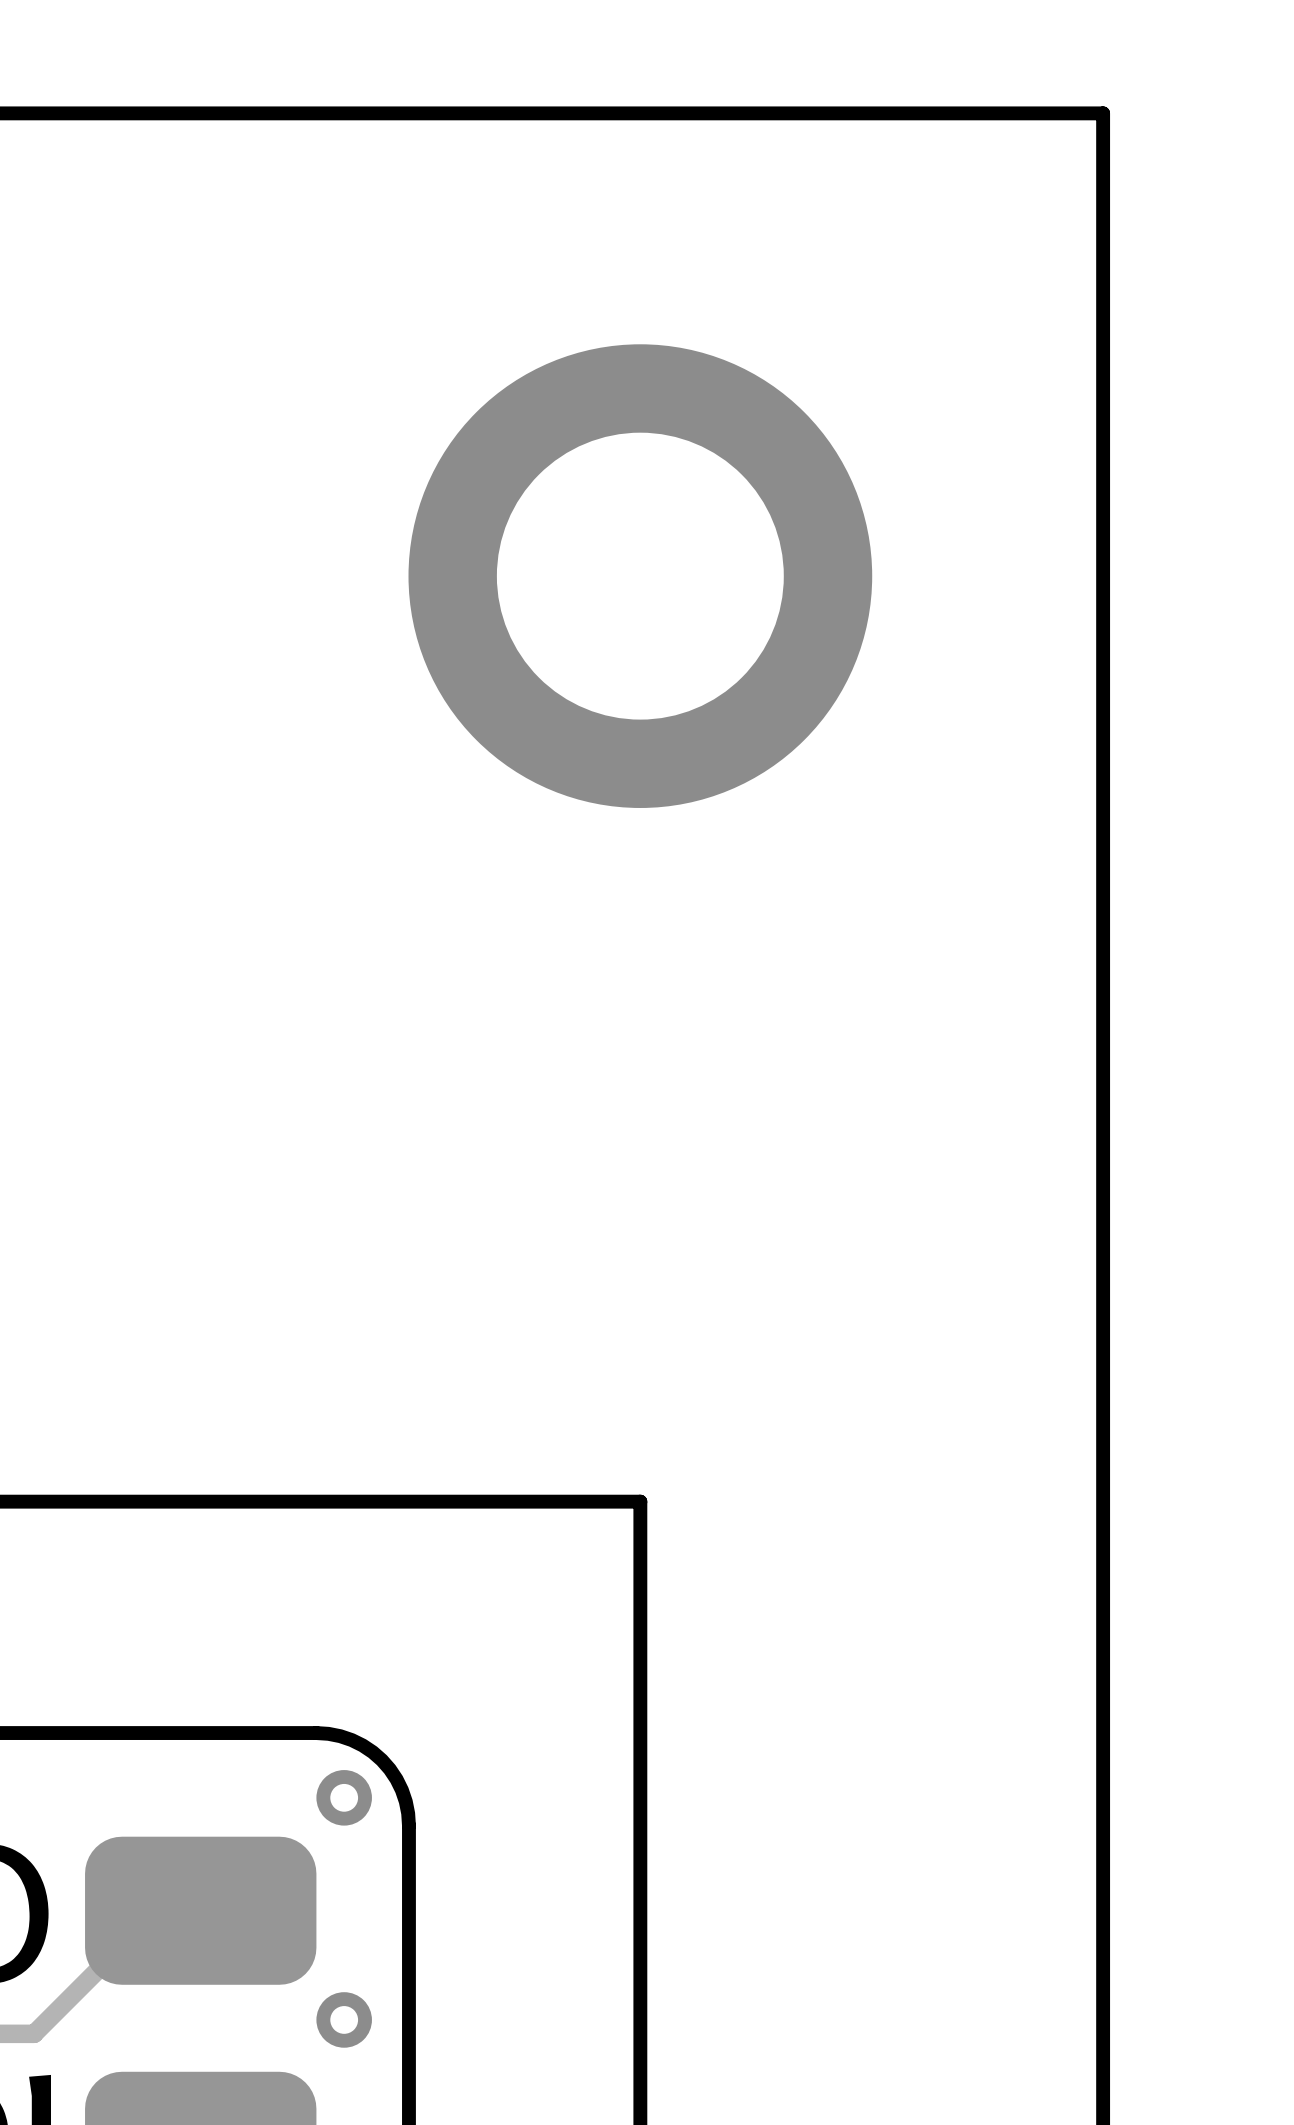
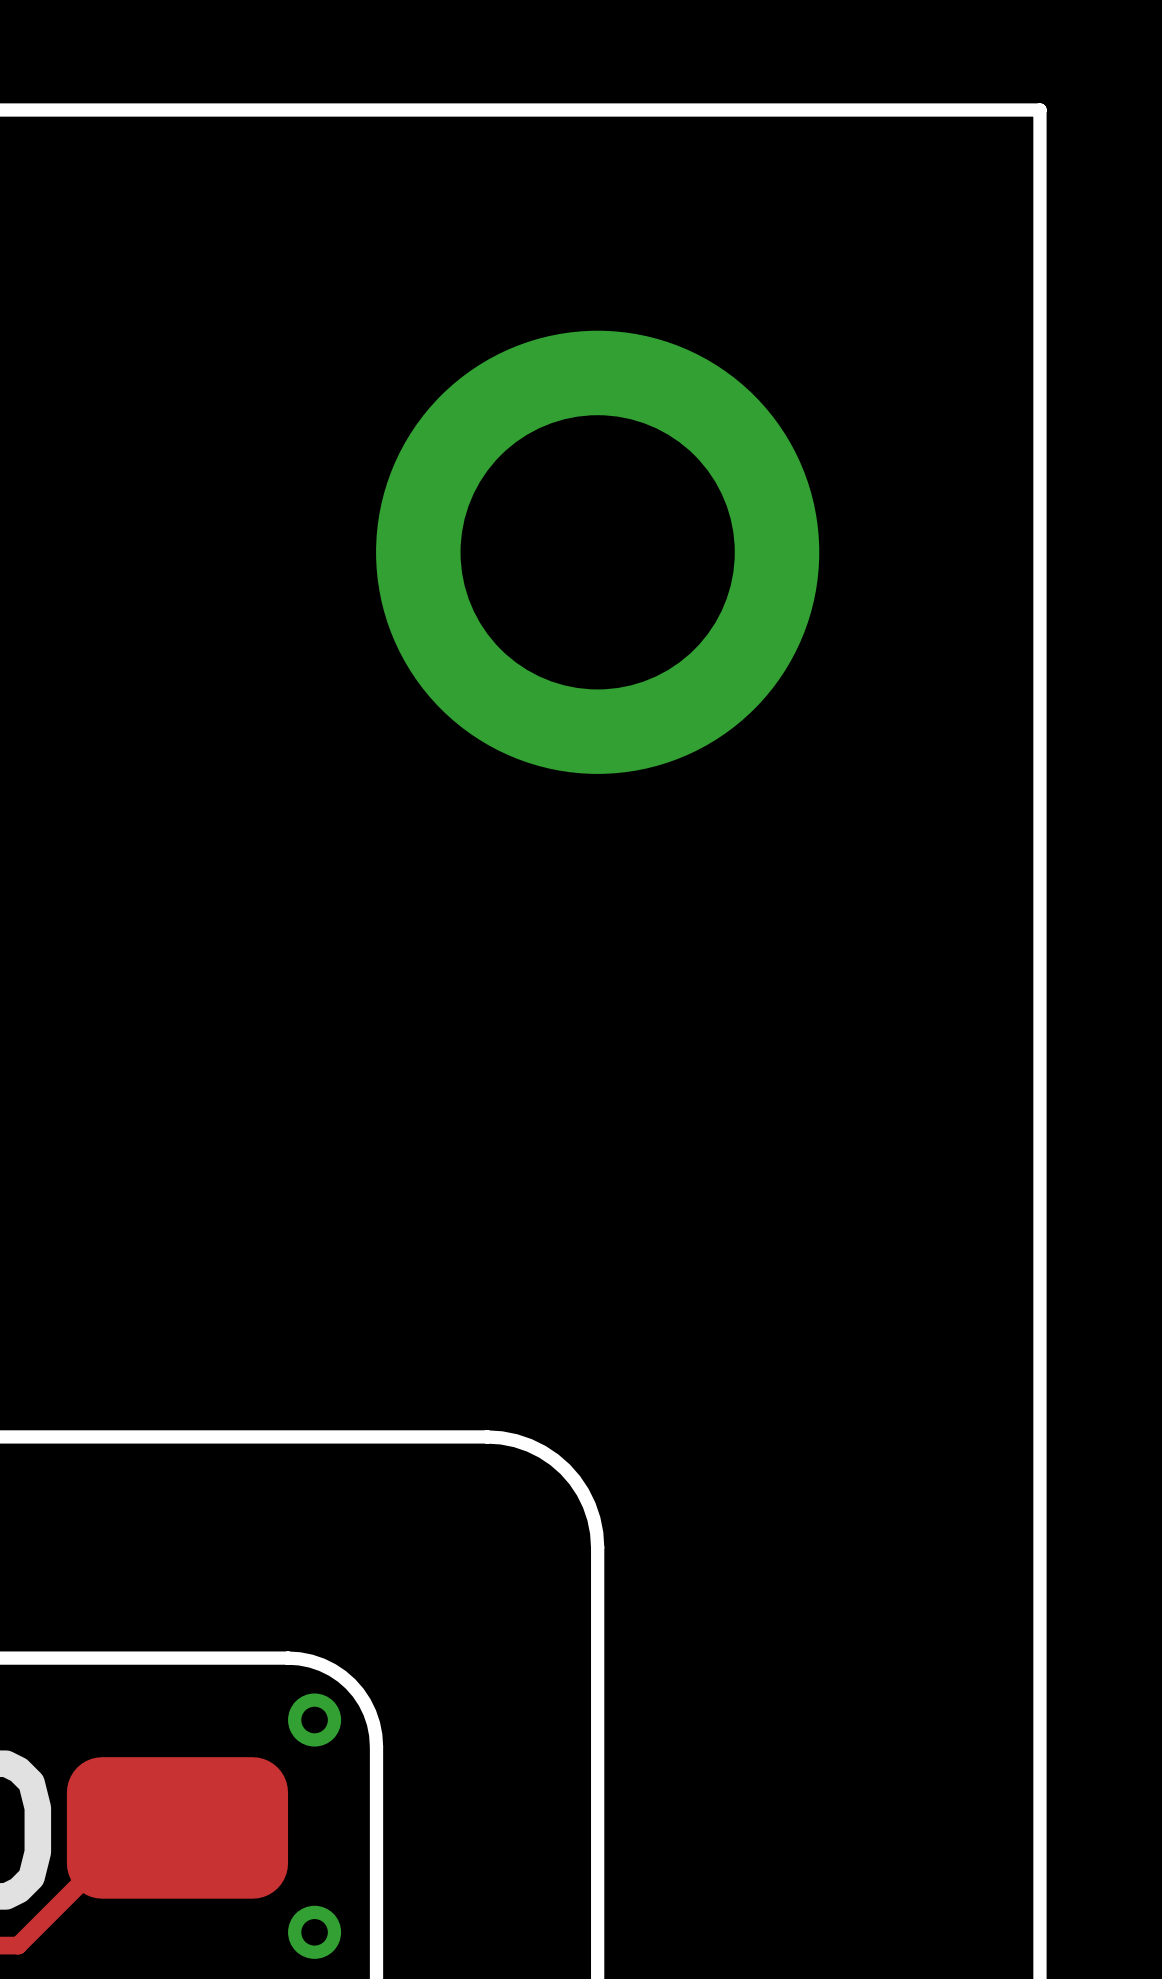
board edge: (524, 1501) (640, 1501) (640, 1617) -> (487, 1436) (501, 1437) (529, 1445) (554, 1459) (565, 1469) (574, 1480) (589, 1505) (596, 1533) (597, 1547)

